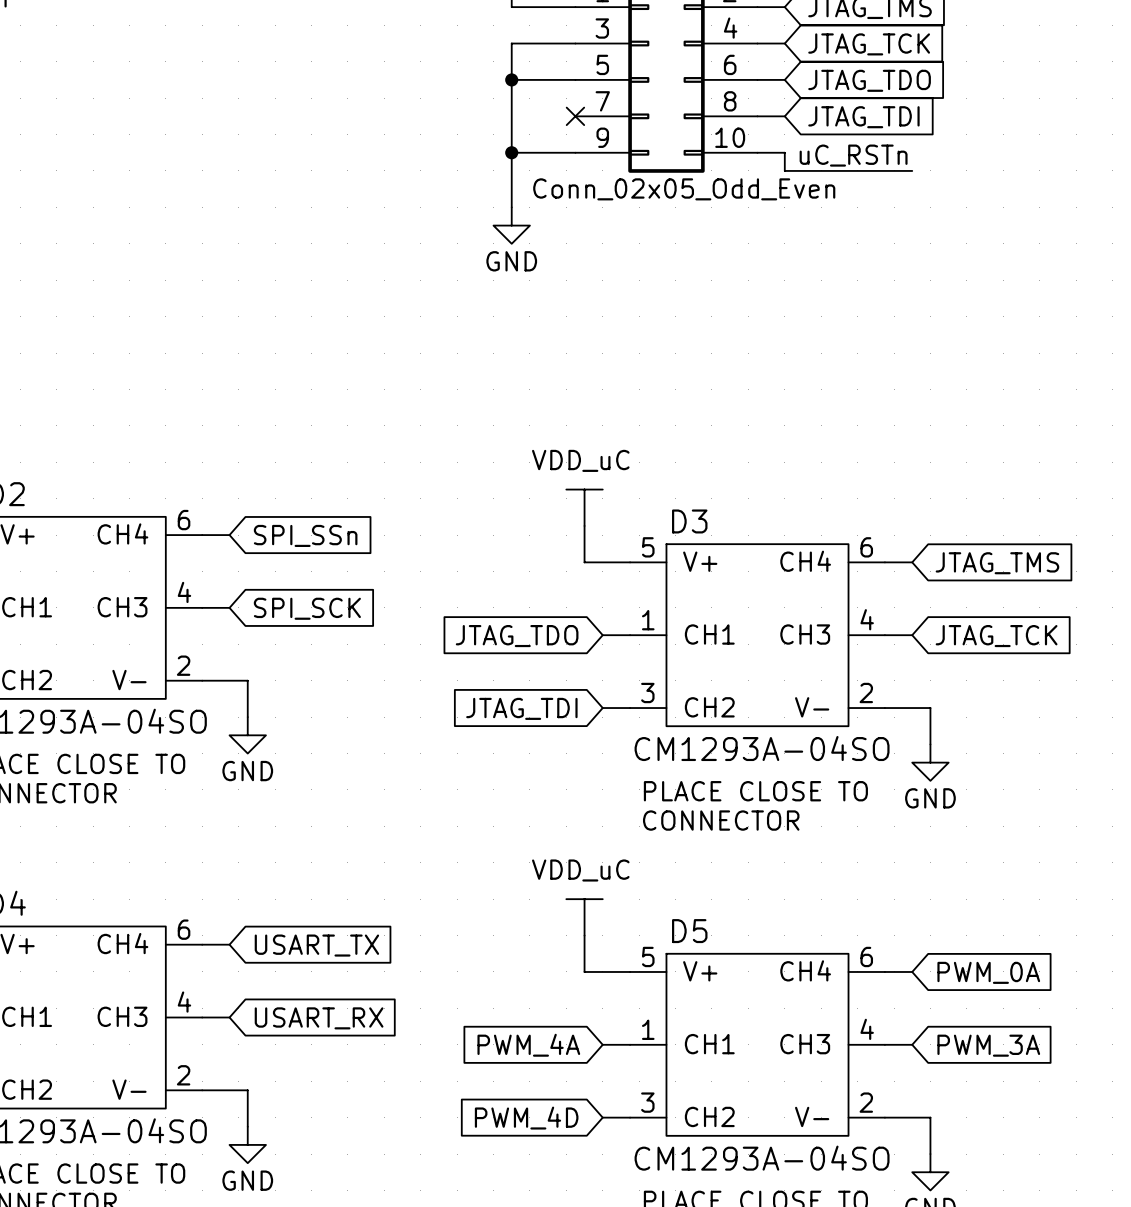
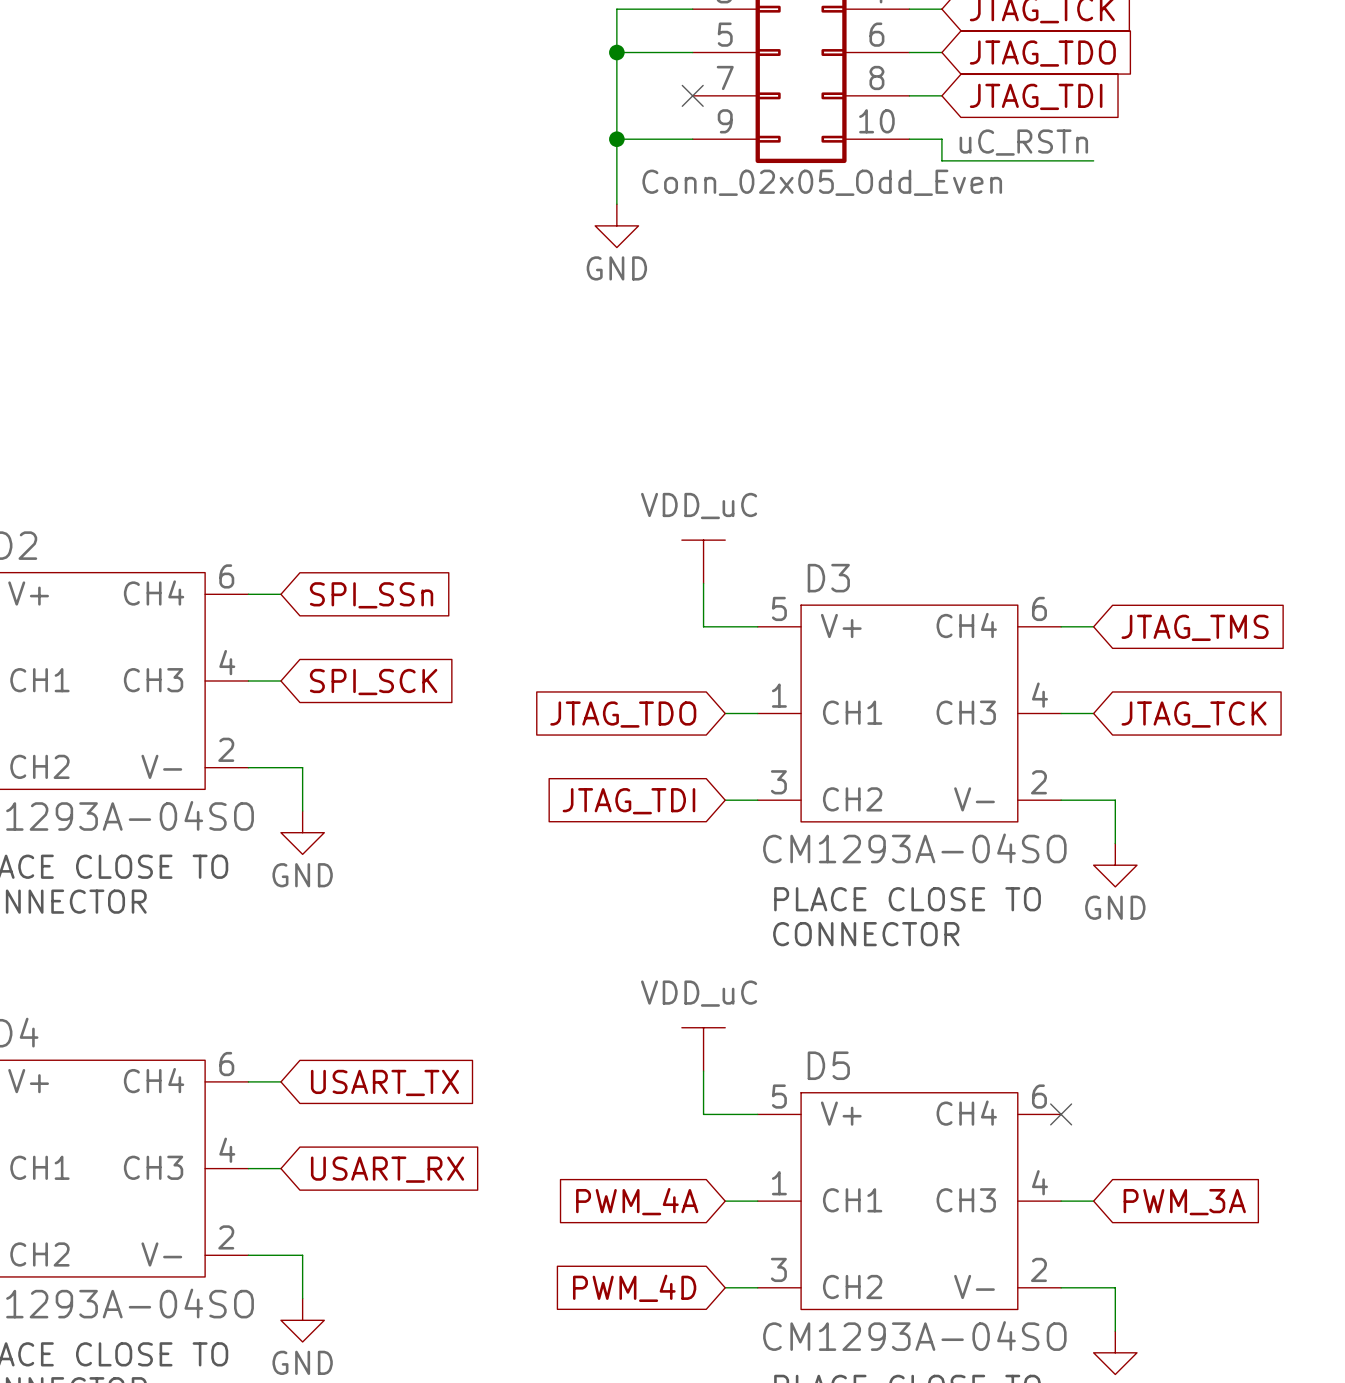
wire: (884, 971) (912, 971) -> none
no-connect mark: none -> (1061, 1114)
global label: PWM_0A (988, 972) -> none

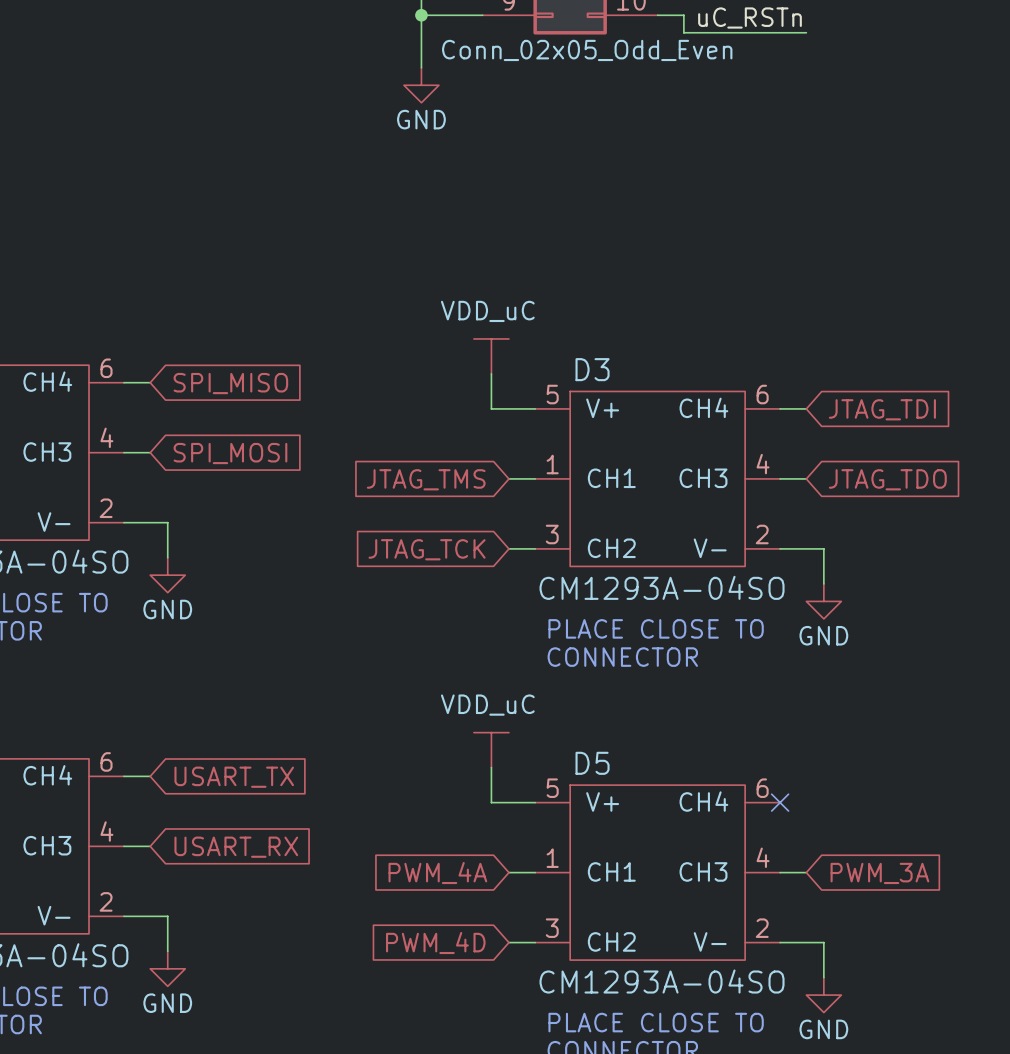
global label: SPI_SSn (371, 595) -> SPI_MISO (230, 383)
global label: JTAG_TMS (1195, 627) -> JTAG_TDI (882, 409)
global label: SPI_SCK (373, 682) -> SPI_MOSI (230, 453)
global label: JTAG_TDO (623, 714) -> JTAG_TMS (426, 479)
global label: JTAG_TCK (1194, 714) -> JTAG_TDO (887, 479)
global label: JTAG_TDI (628, 801) -> JTAG_TCK (427, 549)

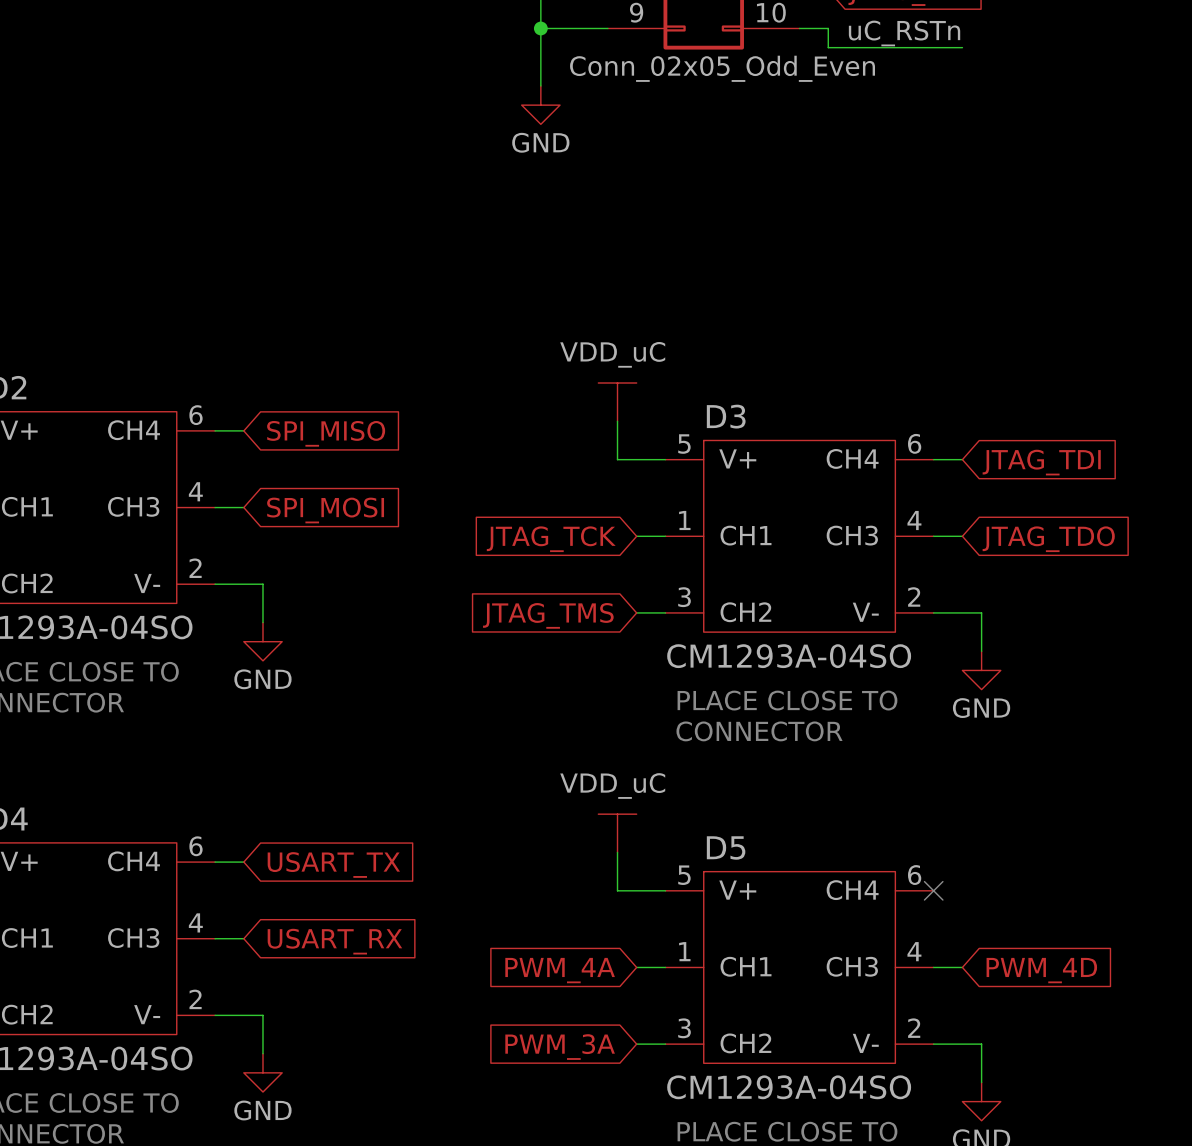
global label: JTAG_TMS (426, 479) -> JTAG_TCK (551, 539)
global label: JTAG_TCK (427, 549) -> JTAG_TMS (548, 615)
global label: PWM_3A (879, 873) -> PWM_4D (1041, 970)
global label: PWM_4D (435, 943) -> PWM_3A (560, 1047)

